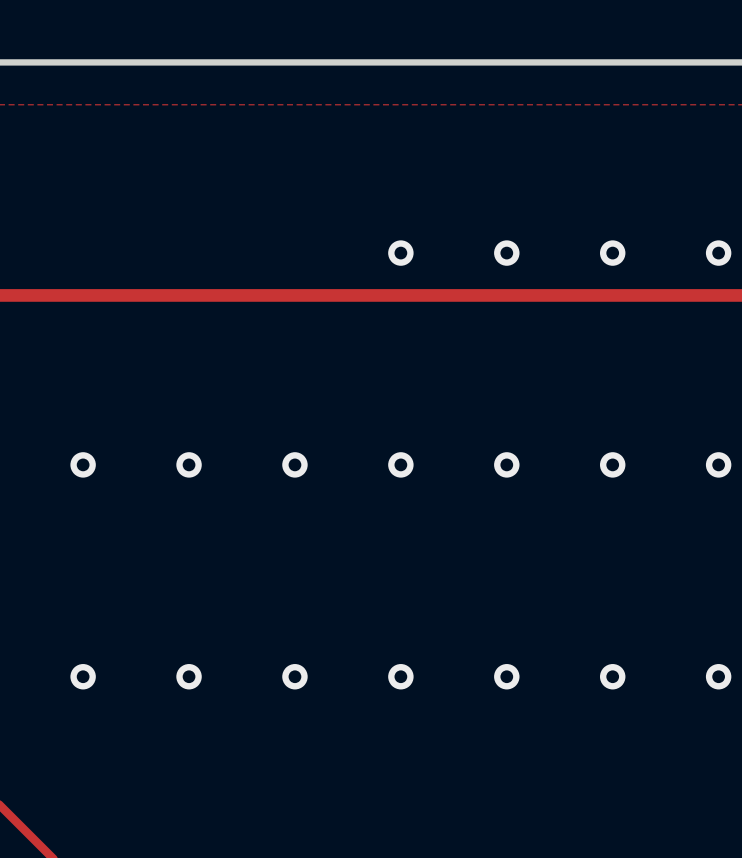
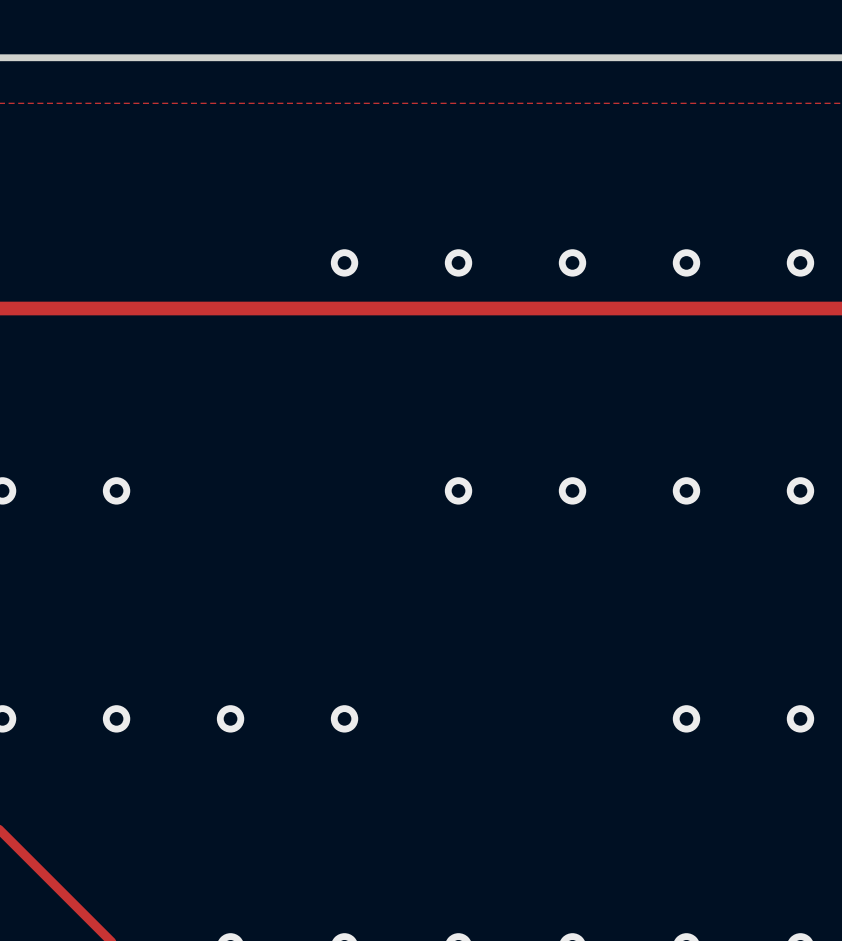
via: none -> (344, 262)
via: (189, 464) -> none
via: (294, 464) -> none
via: (400, 676) -> none
via: (506, 676) -> none

